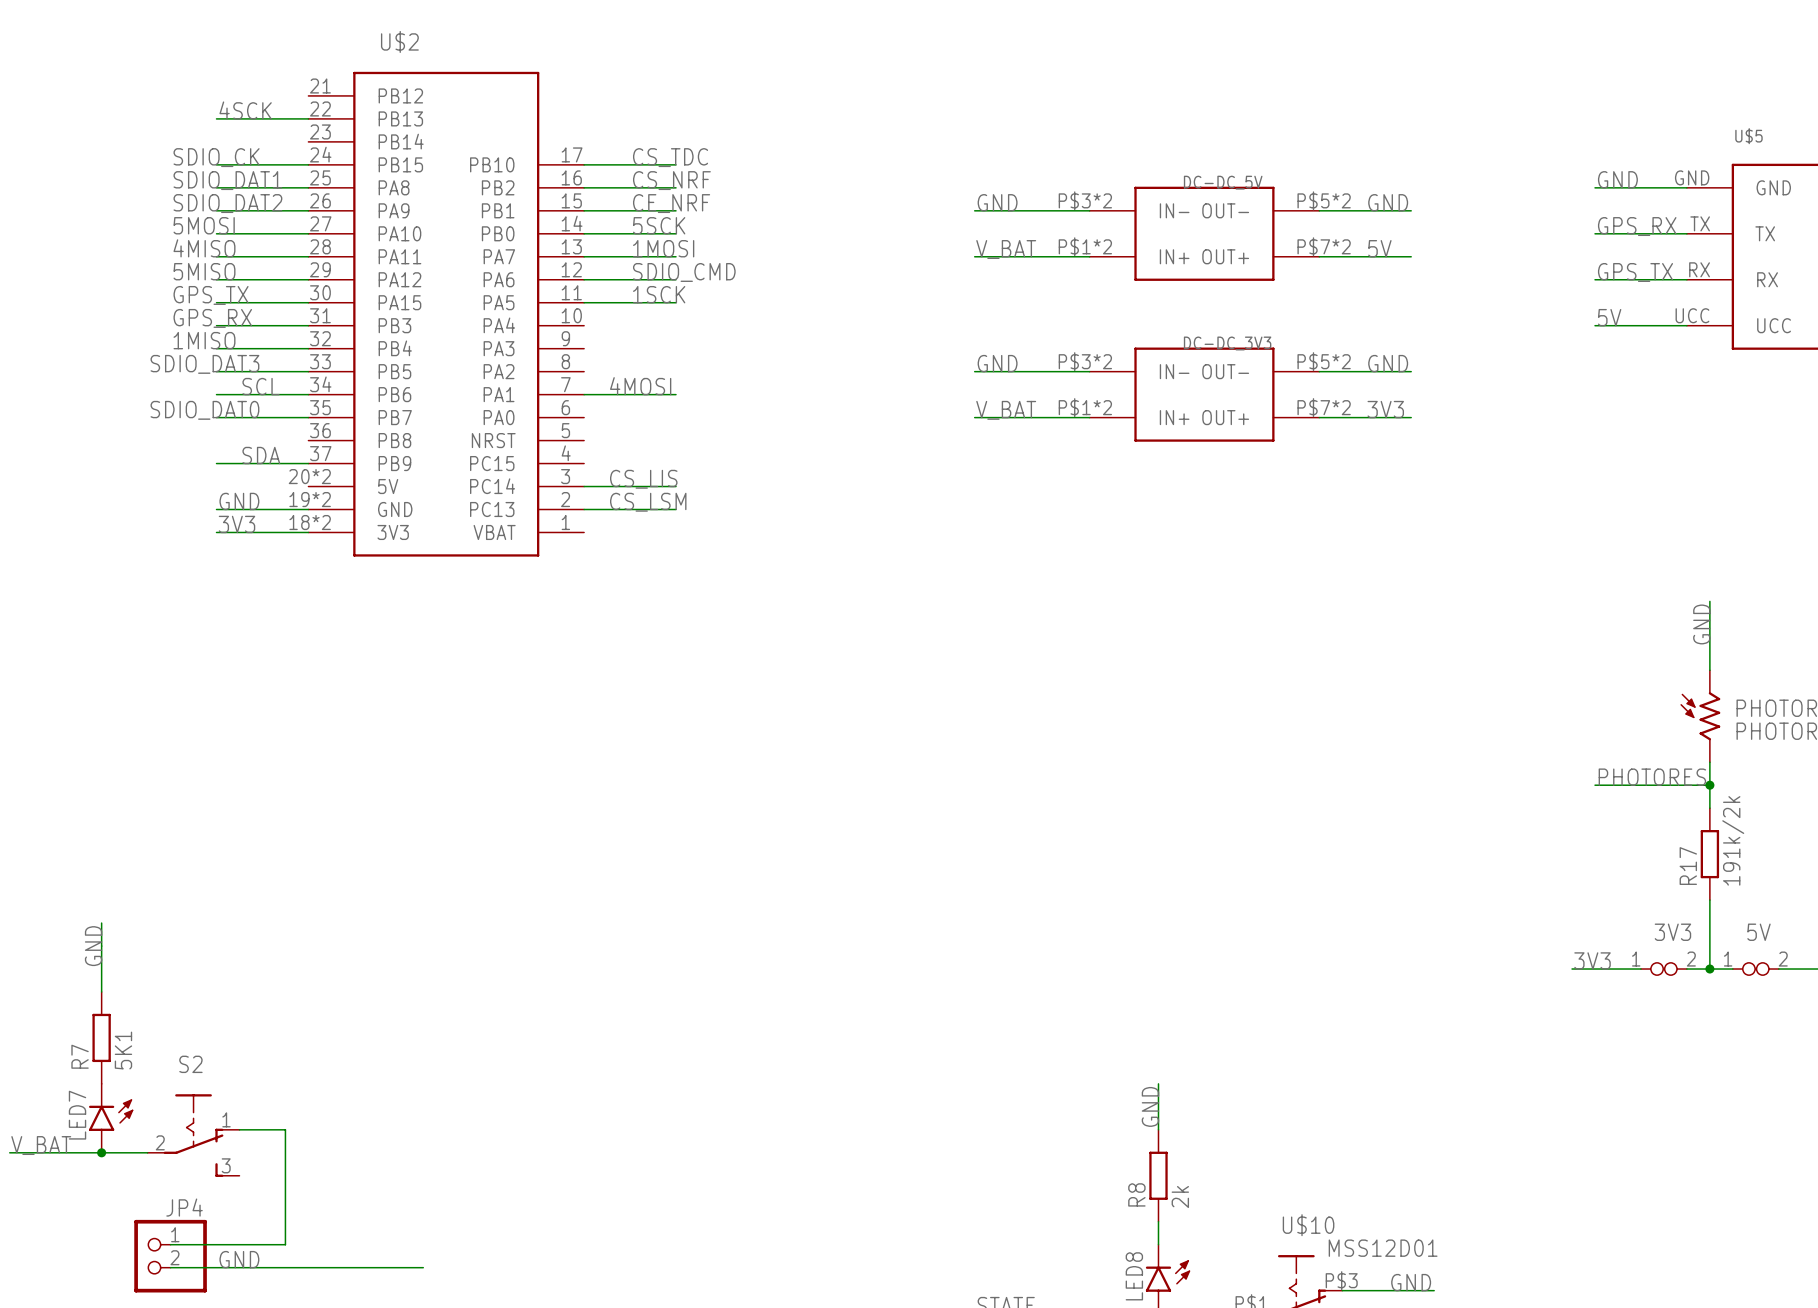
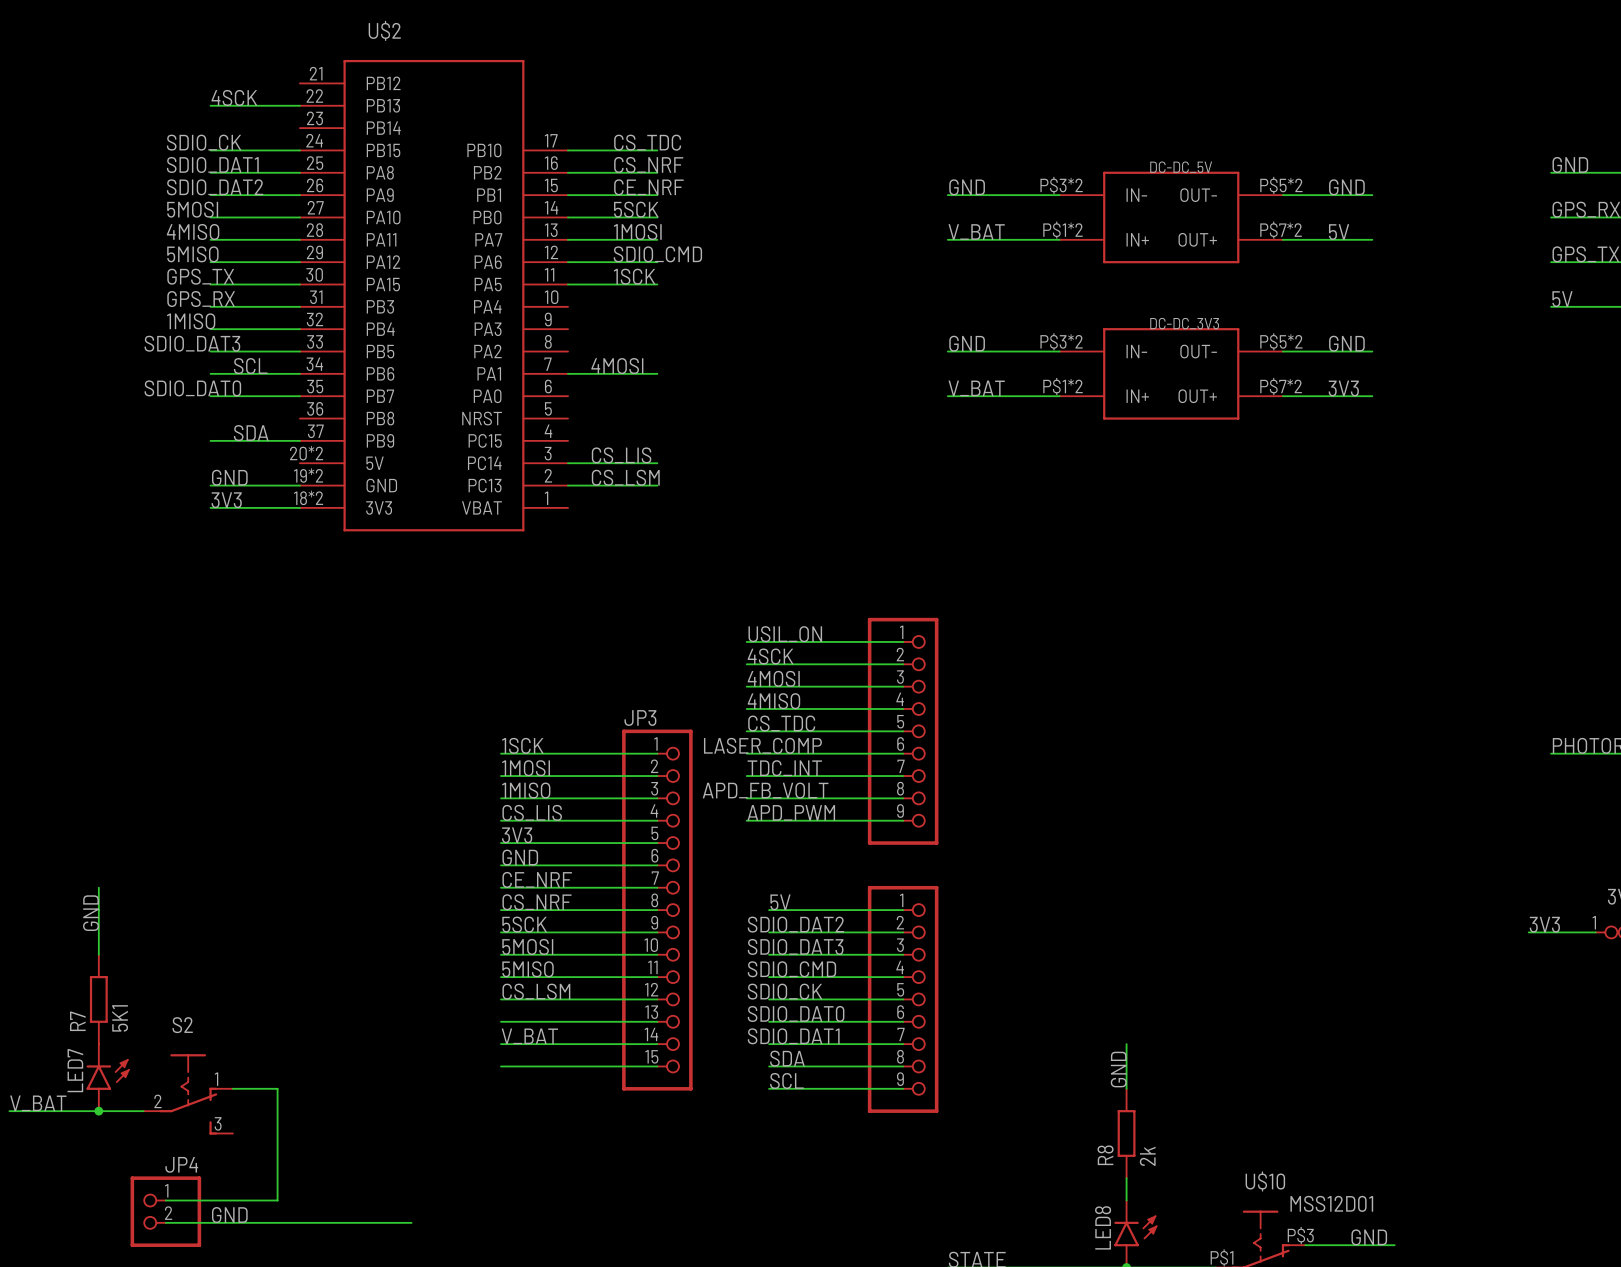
label: none -> USIL_ON (785, 634)
wire: none -> (746, 641) (903, 641)
label: none -> 4SCK (770, 656)
wire: none -> (746, 664) (903, 664)
label: none -> 4MOSI (773, 678)
wire: none -> (746, 686) (903, 686)
label: none -> 4MISO (773, 701)
wire: none -> (746, 708) (903, 708)
label: none -> CS_TDC (781, 723)
wire: none -> (746, 731) (903, 731)
part: none -> (903, 731)
label: none -> 1SCK (522, 745)
label: none -> LASER_COMP (762, 745)
wire: none -> (500, 753) (657, 753)
wire: none -> (746, 753) (903, 753)
label: none -> 1MOSI (526, 768)
label: none -> TDC_INT (784, 768)
wire: none -> (500, 776) (657, 776)
wire: none -> (746, 776) (903, 776)
label: none -> 1MISO (526, 790)
label: none -> APD_FB_VOLT (765, 790)
wire: none -> (500, 798) (657, 798)
wire: none -> (746, 798) (903, 798)
label: none -> CS_LIS (532, 812)
label: none -> APD_PWM (791, 812)
wire: none -> (500, 820) (657, 820)
wire: none -> (746, 820) (903, 820)
label: none -> 3V3 (517, 835)
wire: none -> (500, 843) (657, 843)
label: none -> GND (520, 857)
wire: none -> (500, 865) (657, 865)
label: none -> CE_NRF (537, 879)
wire: none -> (500, 887) (657, 887)
label: none -> 5V (780, 902)
label: none -> CS_NRF (536, 902)
wire: none -> (500, 910) (657, 910)
JP3: none -> (657, 910)
wire: none -> (769, 910) (903, 910)
label: none -> 5SCK (524, 924)
label: none -> SDIO_DAT2 (795, 924)
wire: none -> (500, 932) (657, 932)
wire: none -> (769, 932) (903, 932)
label: none -> 5MOSI (527, 946)
label: none -> SDIO_DAT3 (795, 946)
wire: none -> (500, 954) (657, 954)
wire: none -> (769, 954) (903, 954)
label: none -> 5MISO (528, 969)
label: none -> SDIO_CMD (791, 969)
wire: none -> (500, 977) (657, 977)
wire: none -> (769, 977) (903, 977)
label: none -> CS_LSM (536, 991)
label: none -> SDIO_CK (785, 991)
wire: none -> (500, 999) (657, 999)
wire: none -> (769, 999) (903, 999)
part: none -> (903, 999)
label: none -> SDIO_DAT0 (796, 1013)
wire: none -> (500, 1021) (657, 1021)
wire: none -> (769, 1021) (903, 1021)
label: none -> V_BAT (529, 1036)
label: none -> SDIO_DAT1 (793, 1036)
wire: none -> (500, 1044) (657, 1044)
wire: none -> (769, 1044) (903, 1044)
label: none -> SDA (787, 1058)
wire: none -> (500, 1066) (657, 1066)
wire: none -> (769, 1066) (903, 1066)
label: none -> SCL (786, 1081)
wire: none -> (769, 1088) (903, 1088)

